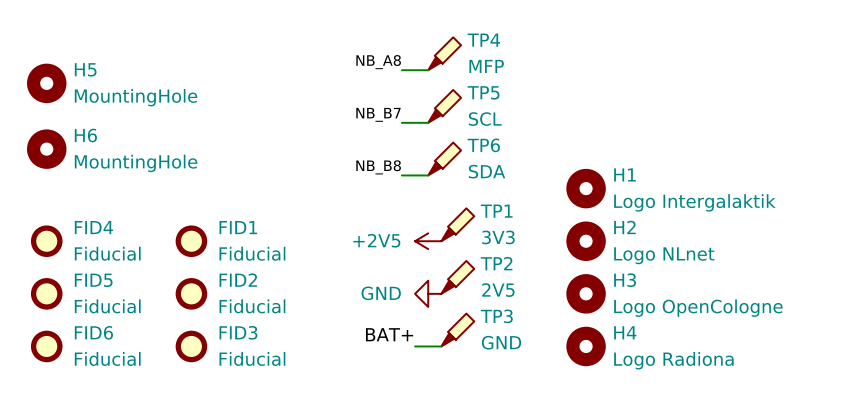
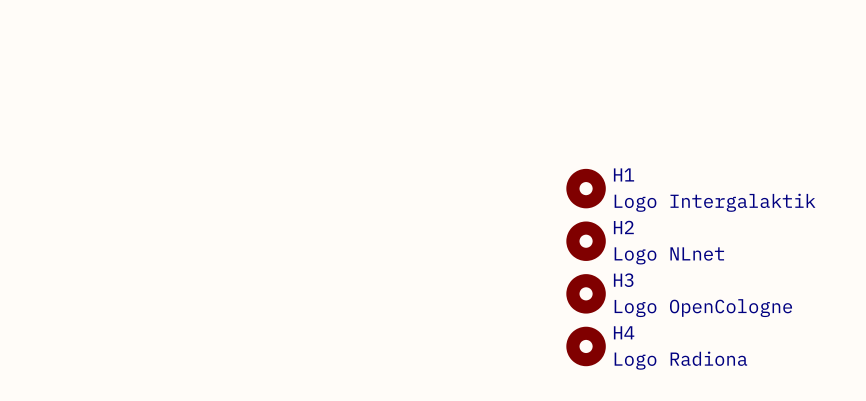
TP4: MFP (444, 53) -> none
label: NB_A8 (378, 62) -> none
wire: (401, 70) (428, 70) -> none
H5: MountingHole (46, 83) -> none
TP5: SCL (444, 106) -> none
label: NB_B7 (378, 114) -> none
wire: (401, 122) (428, 122) -> none
H6: MountingHole (46, 149) -> none
TP6: SDA (444, 159) -> none
label: NB_B8 (378, 167) -> none
wire: (401, 175) (428, 175) -> none
TP1: 3V3 (457, 224) -> none
FID4: Fiducial (46, 241) -> none
FID1: Fiducial (191, 241) -> none
power symbol: +2V5 (428, 241) -> none
TP2: 2V5 (457, 277) -> none
FID5: Fiducial (46, 293) -> none
FID2: Fiducial (191, 293) -> none
power symbol: GND (428, 293) -> none
TP3: GND (457, 330) -> none
label: BAT+ (389, 334) -> none
FID6: Fiducial (46, 346) -> none
FID3: Fiducial (191, 346) -> none
wire: (415, 346) (441, 346) -> none

